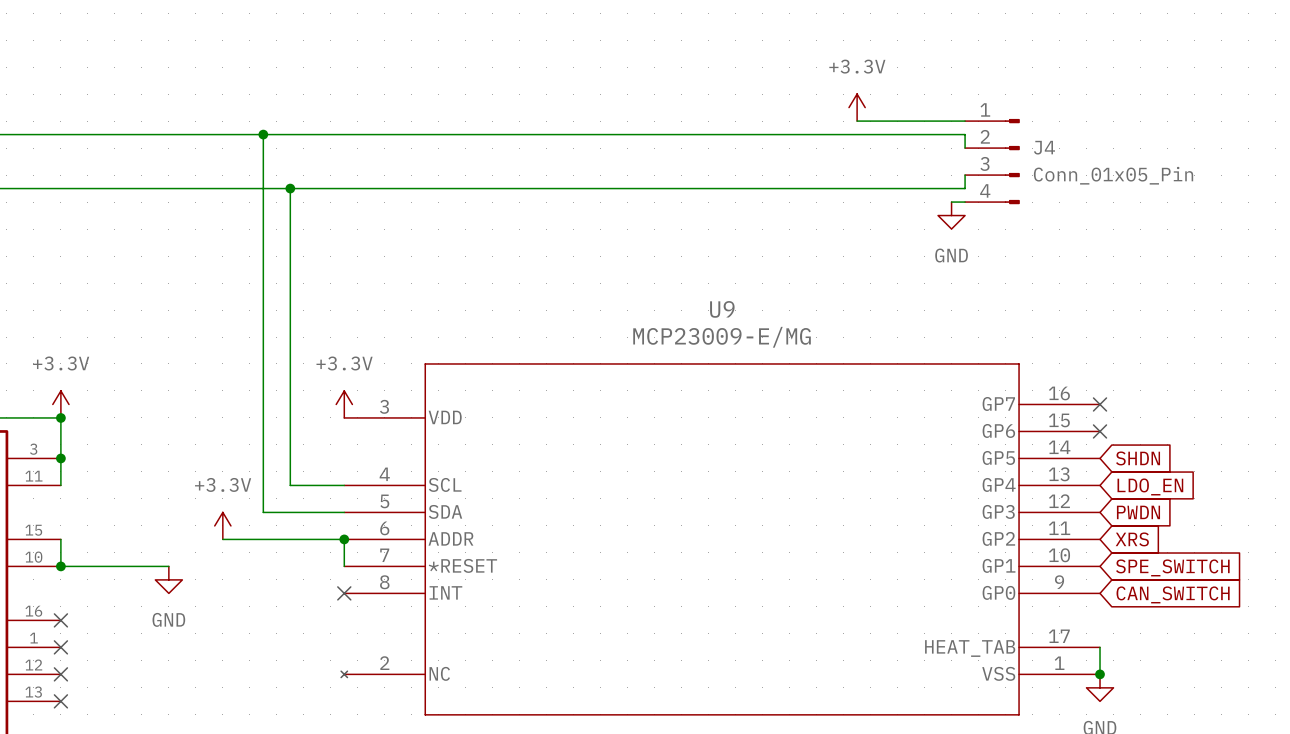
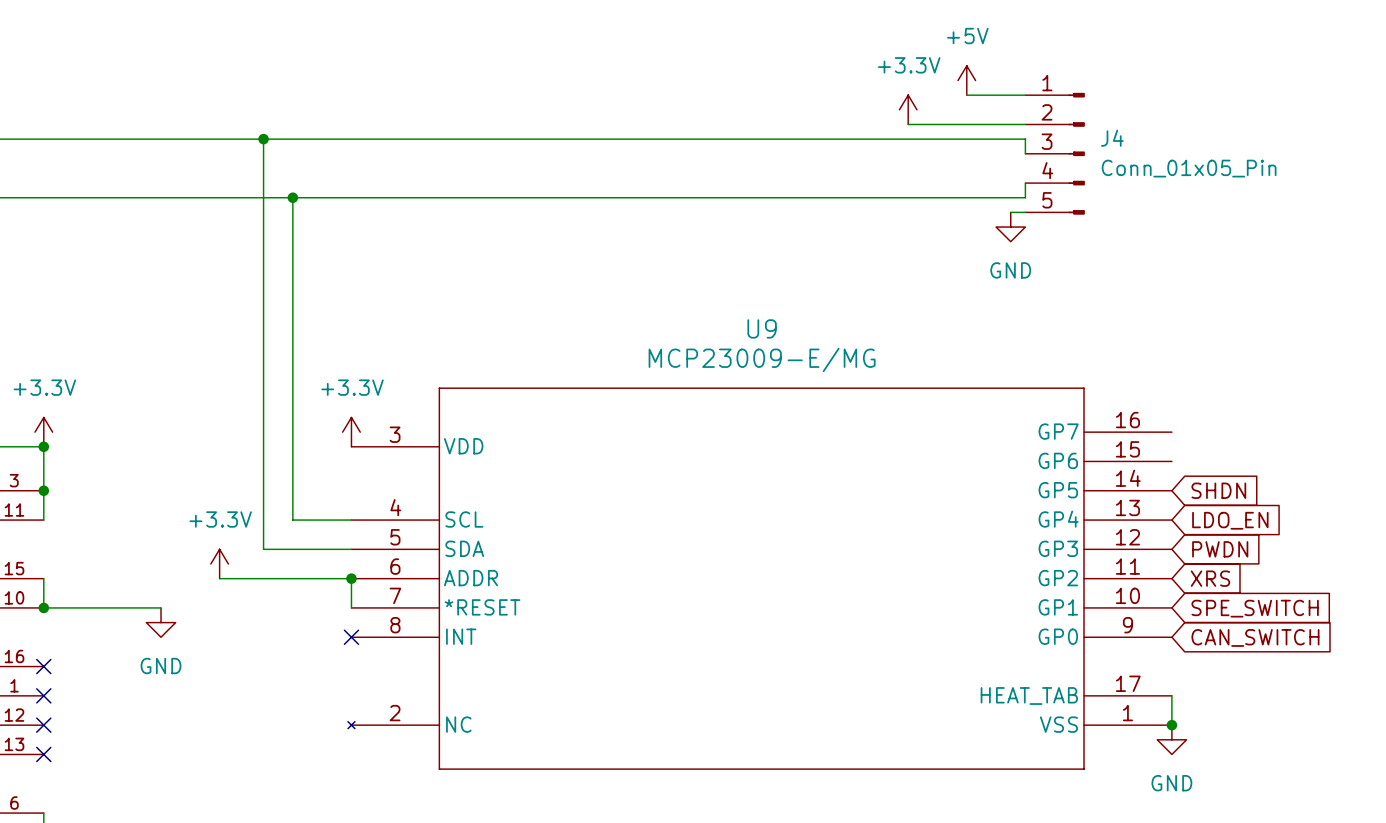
power symbol: none -> +5V (966, 80)
wire: none -> (966, 95) (1025, 95)
J4 symbol: [965, 118, 1020, 205] -> [1025, 92, 1085, 215]
no-connect mark: (1100, 404) -> none
no-connect mark: (1100, 431) -> none

